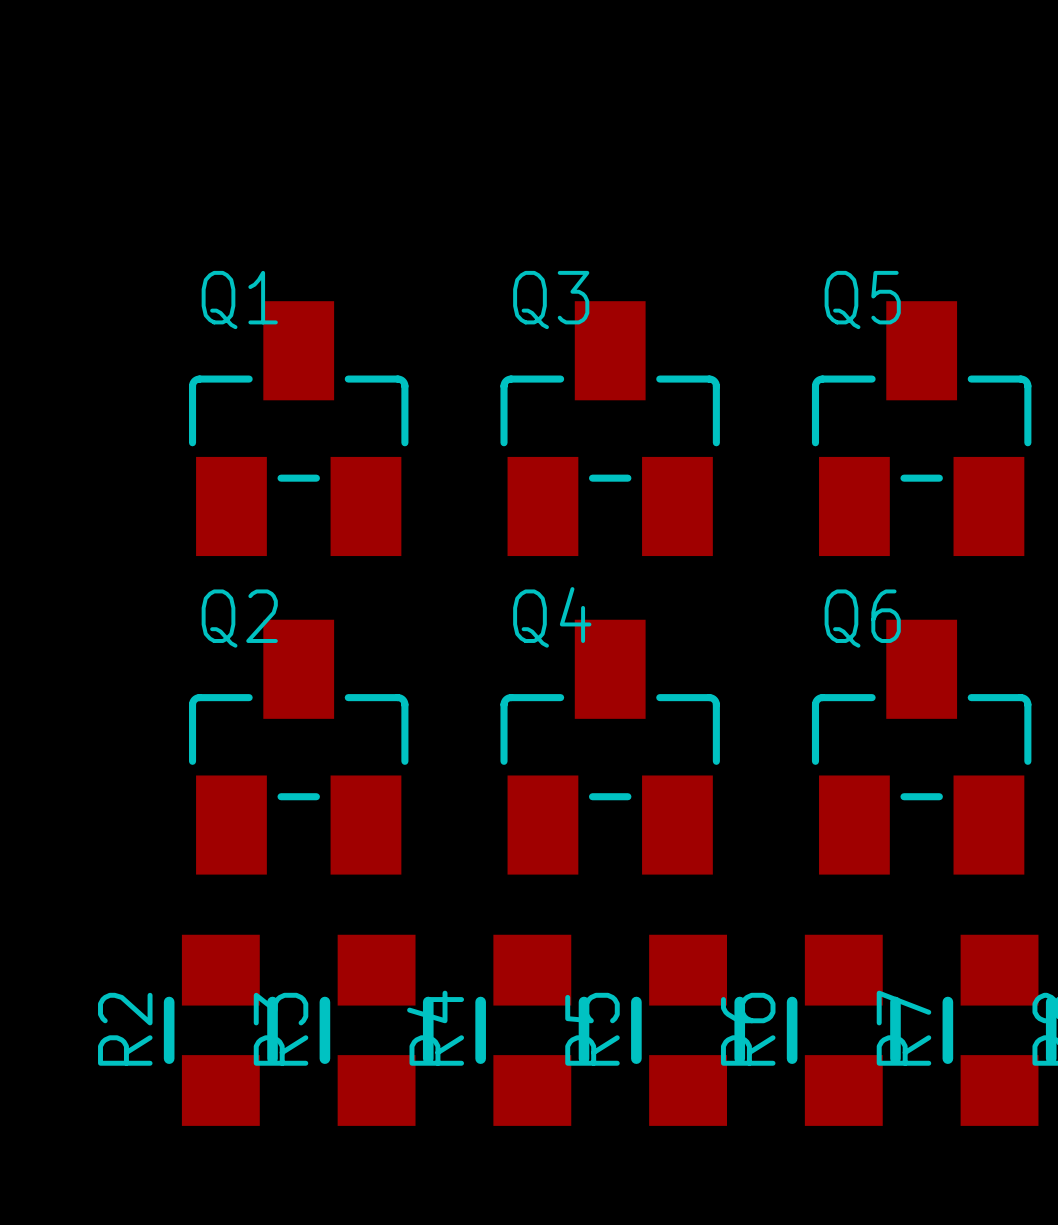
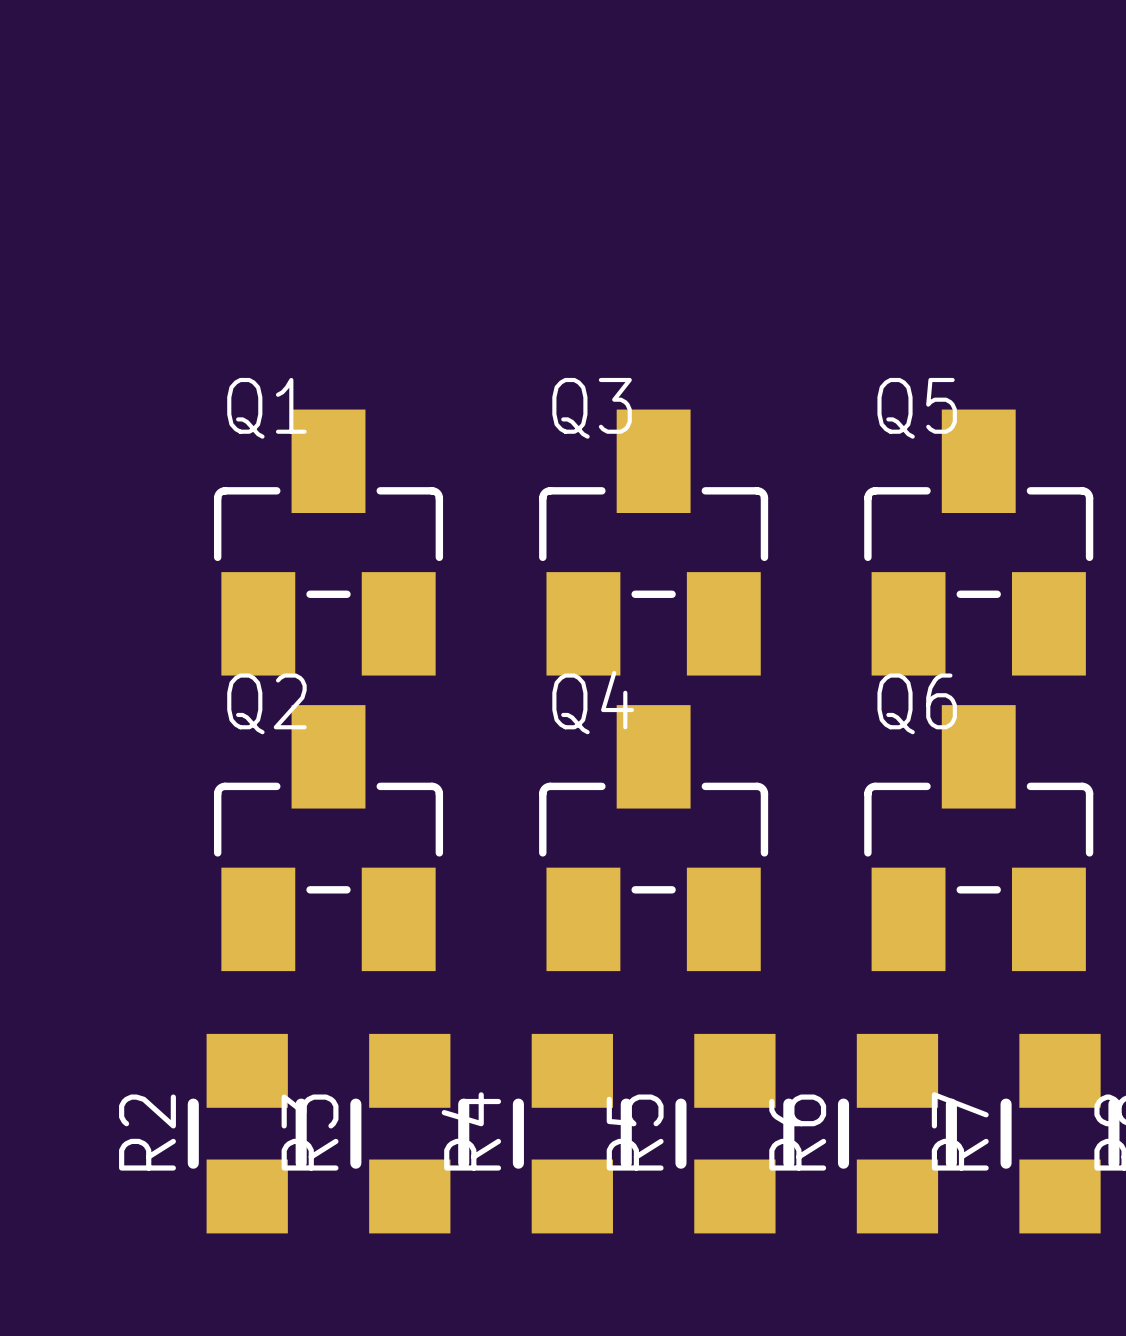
Q1 position: (298, 428) -> (328, 542)
Q3 position: (610, 428) -> (653, 542)
Q5 position: (921, 428) -> (978, 542)

